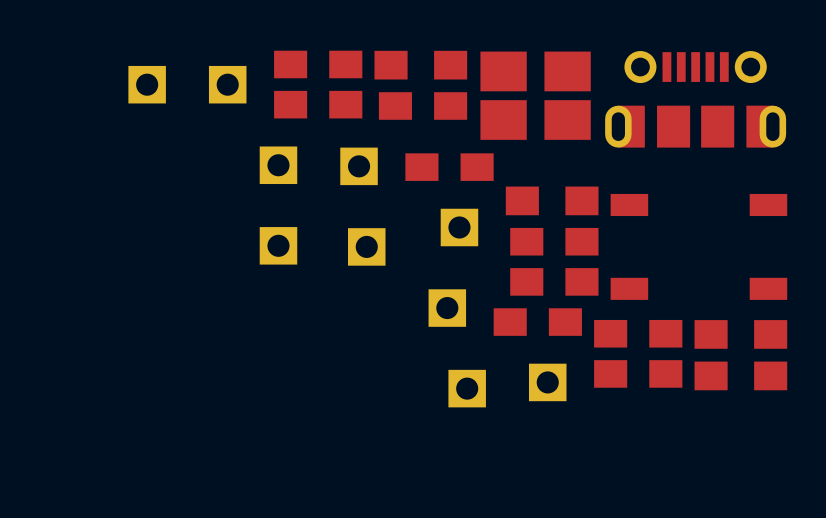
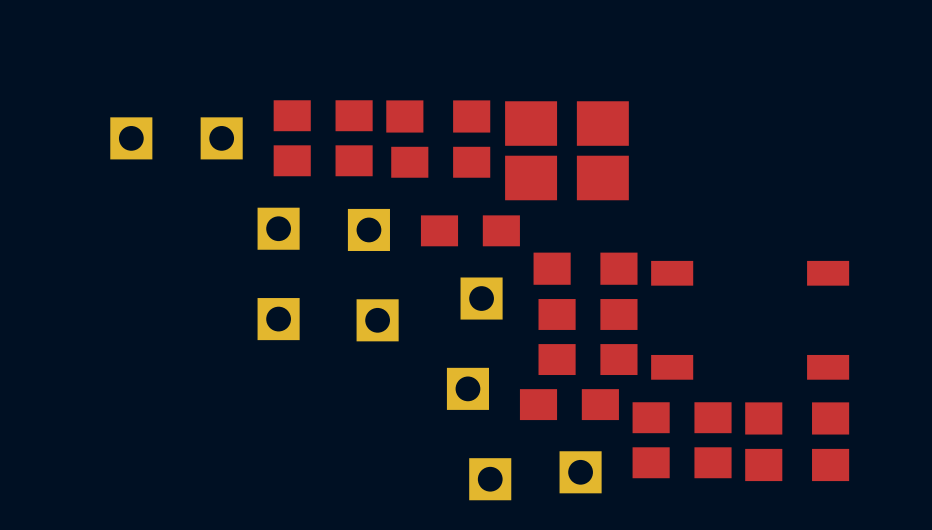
part: (695, 99) -> none

